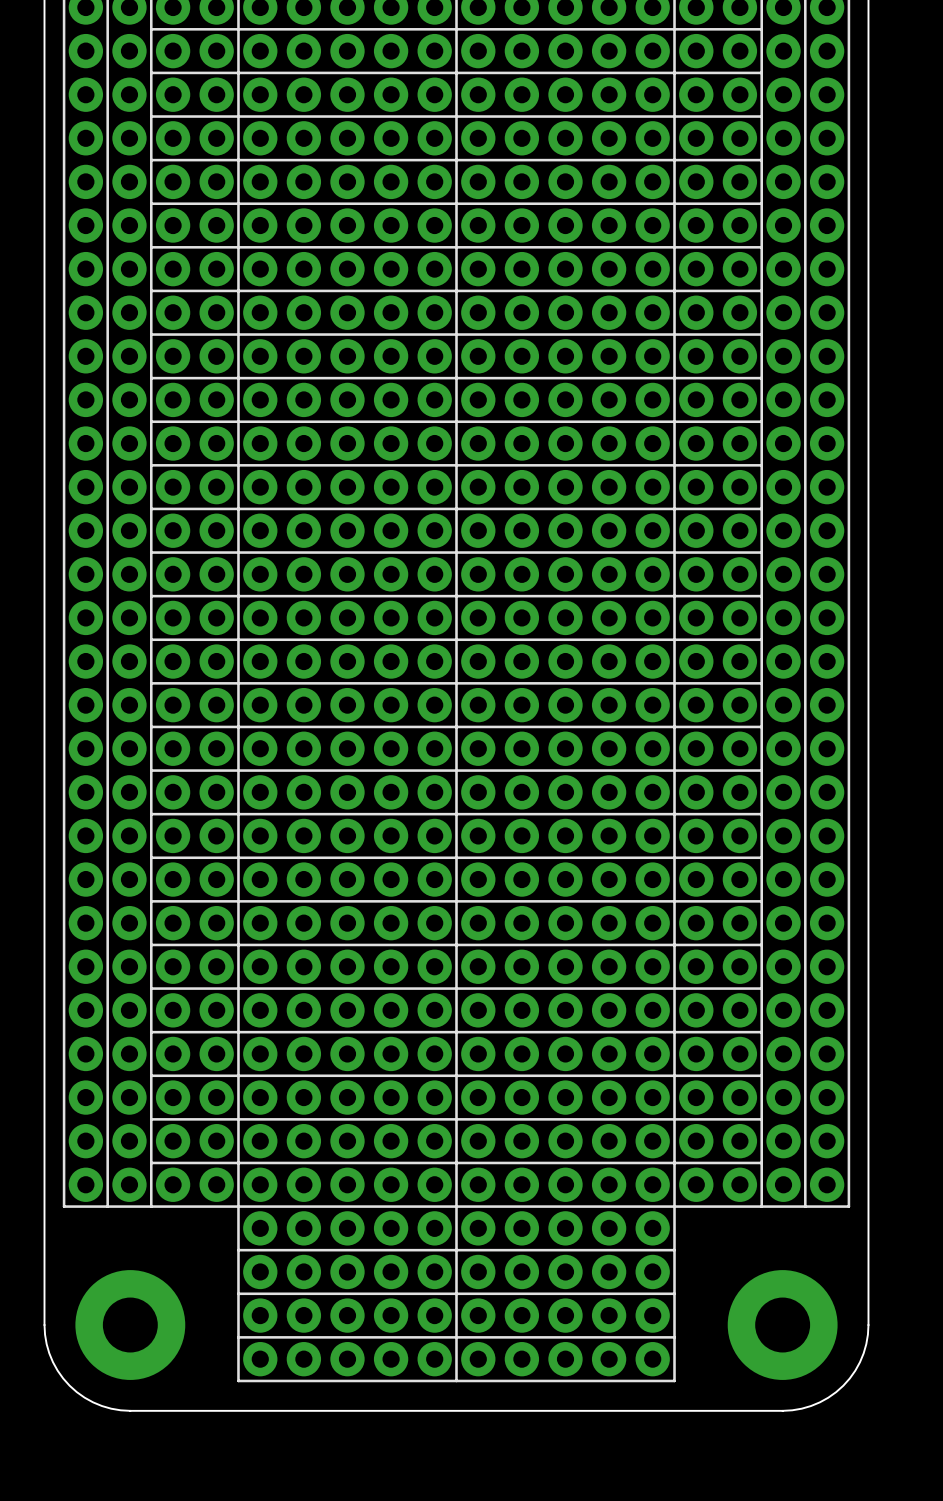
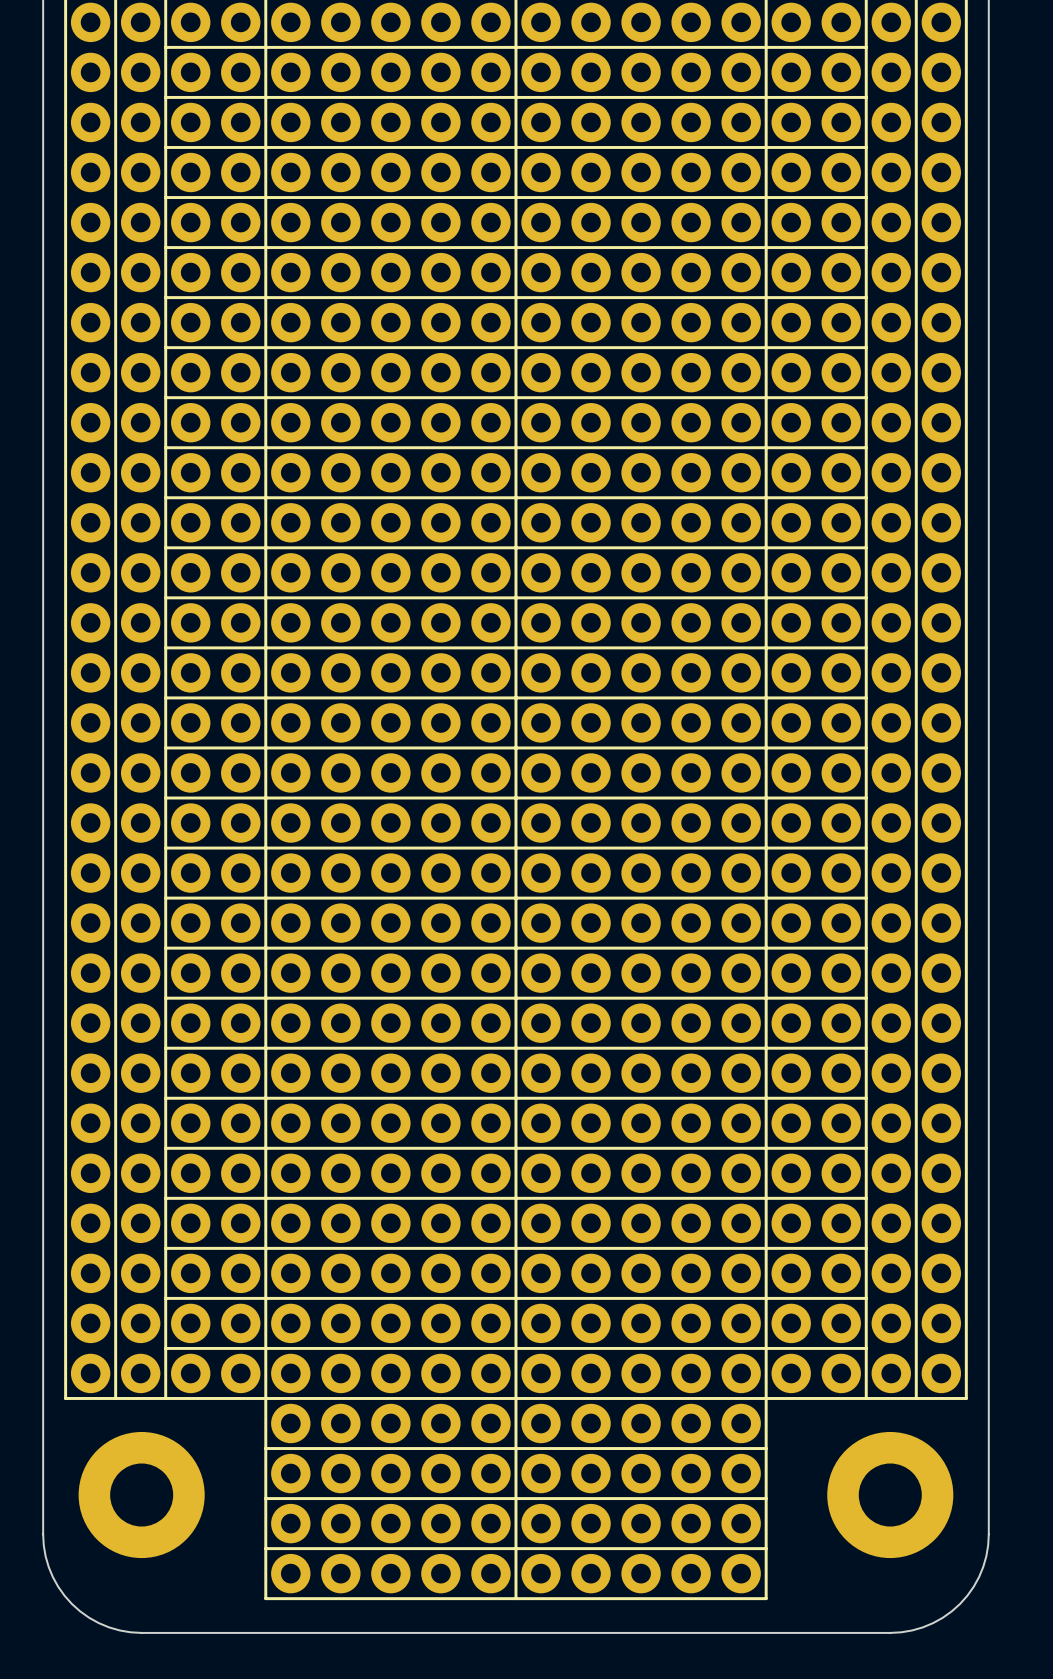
part position: (130, 1325) -> (141, 1495)
part position: (782, 1325) -> (890, 1495)

